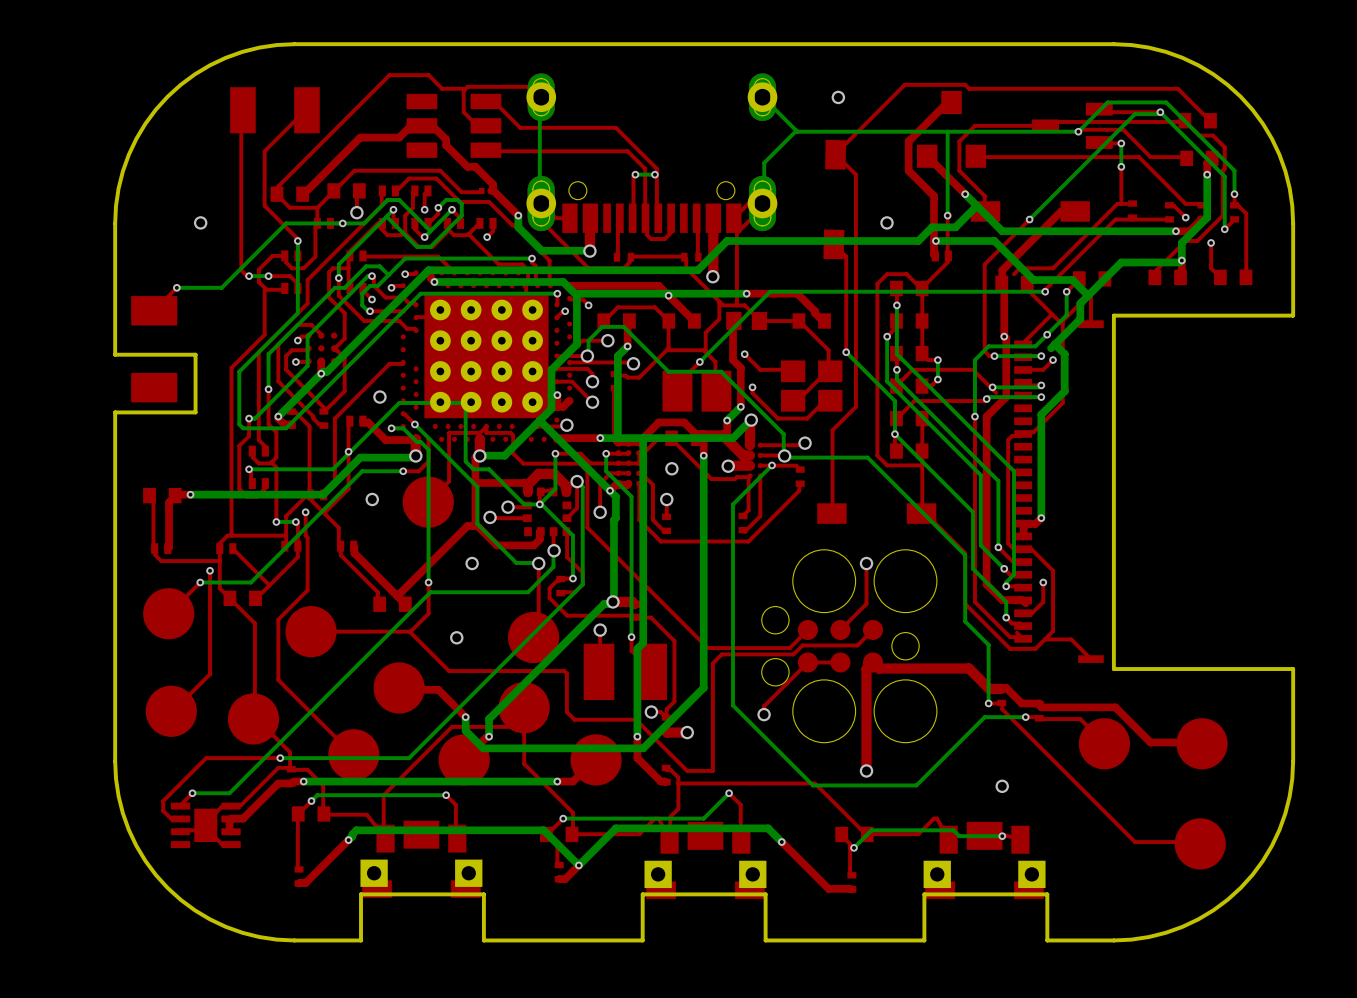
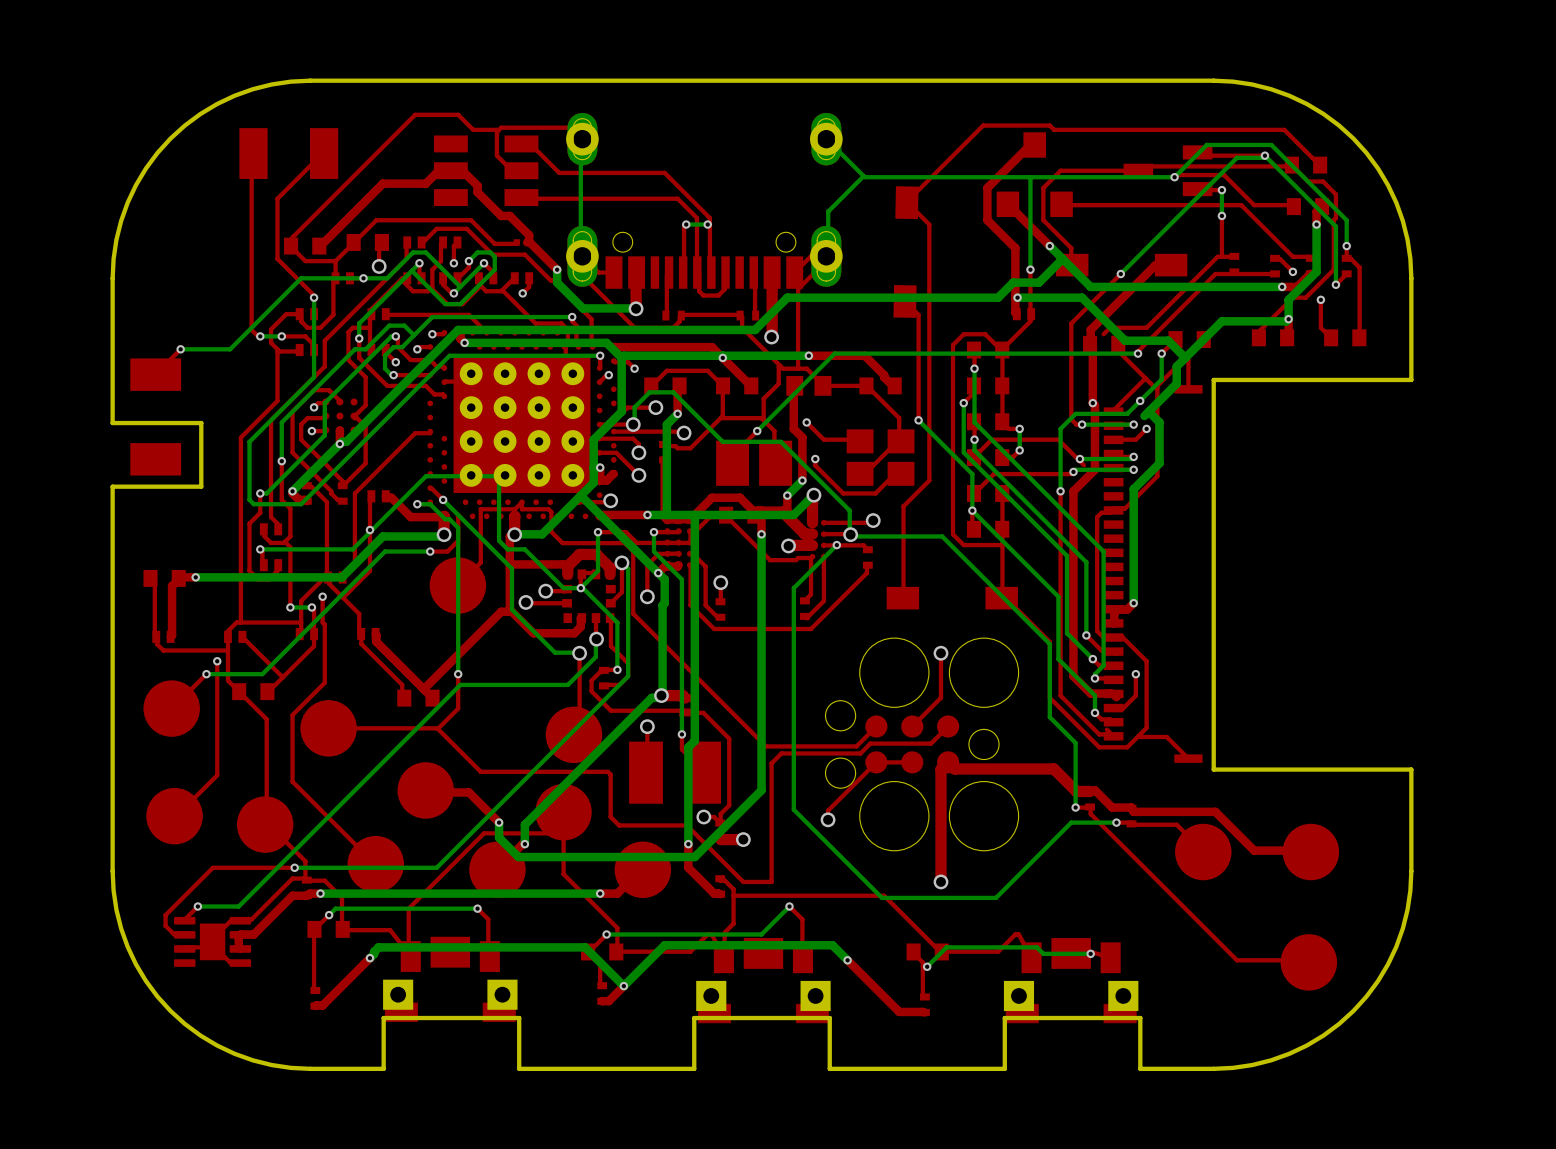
via: (838, 97) -> none
via: (200, 222) -> none
via: (887, 222) -> none
via: (379, 397) -> none
via: (671, 468) -> none
via: (372, 499) -> none
via: (472, 563) -> none
via: (456, 637) -> none
via: (1002, 786) -> none

